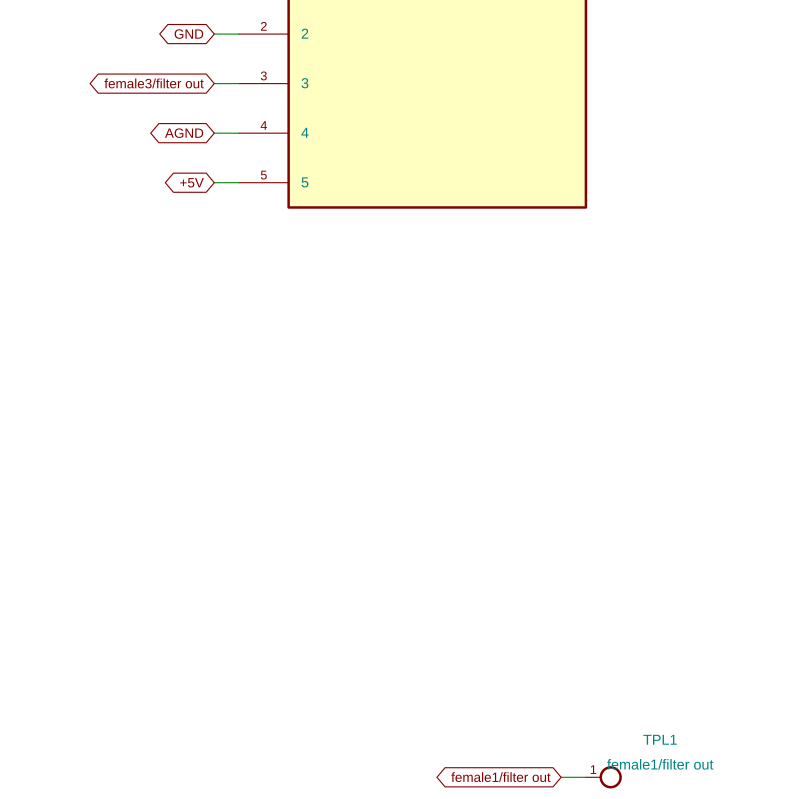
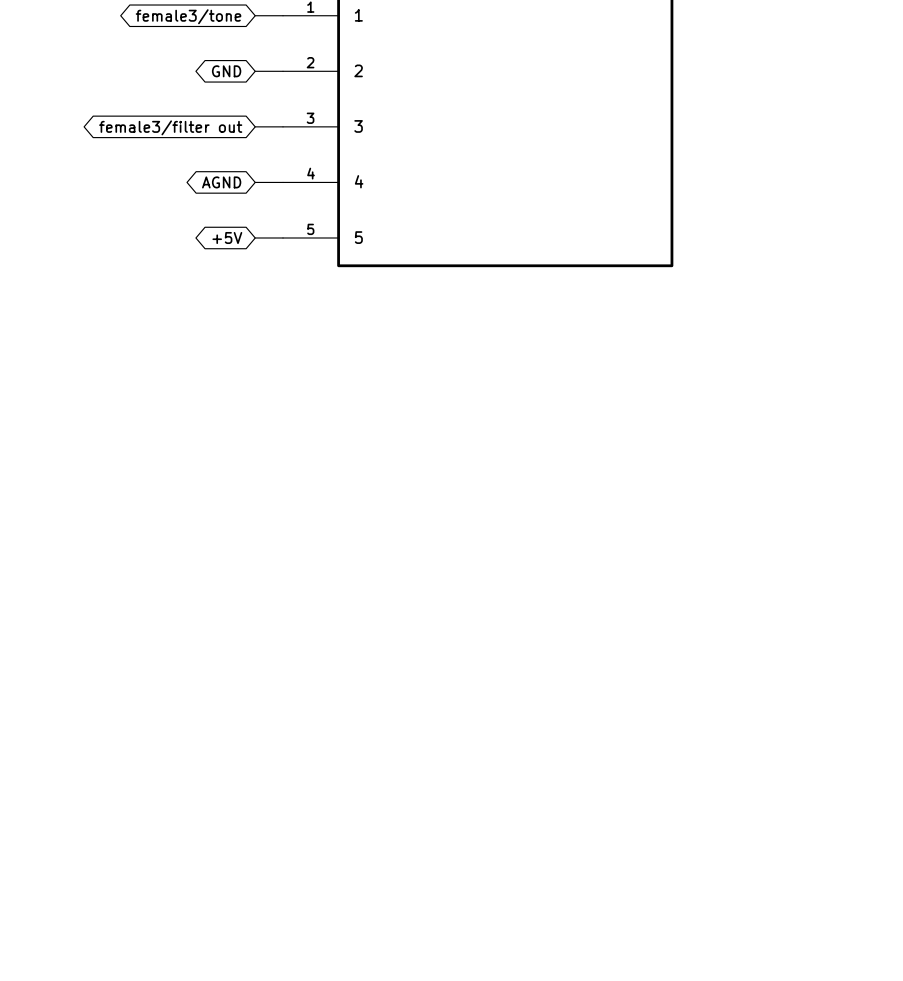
global label: female1/filter out (500, 777) -> none
wire: (561, 777) (585, 777) -> none
TPL1: female1/filter out (603, 777) -> none

